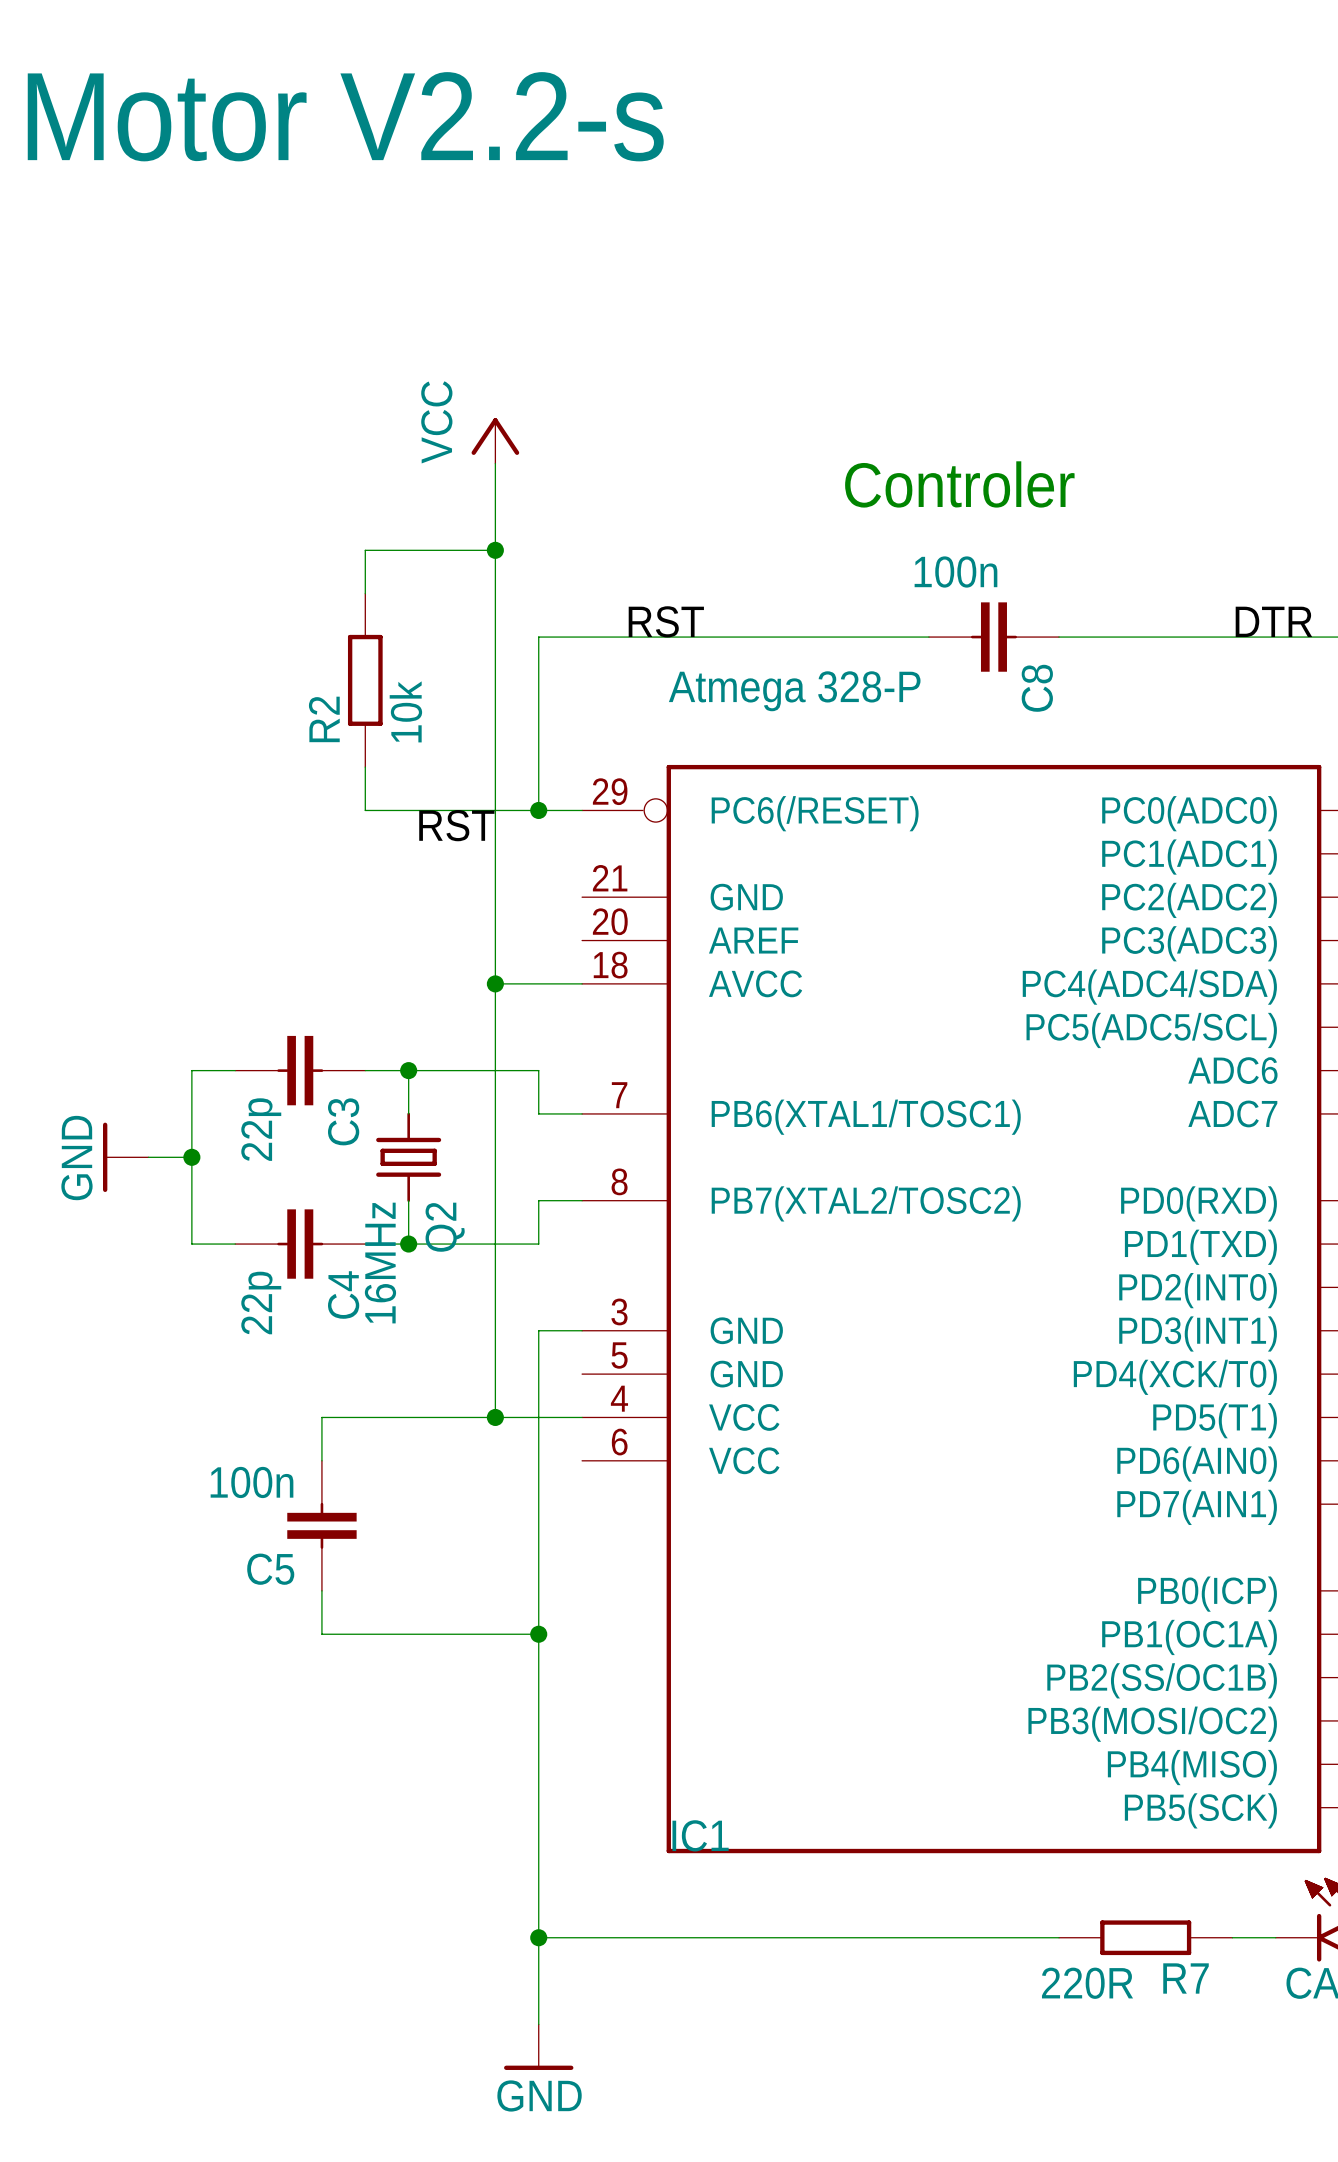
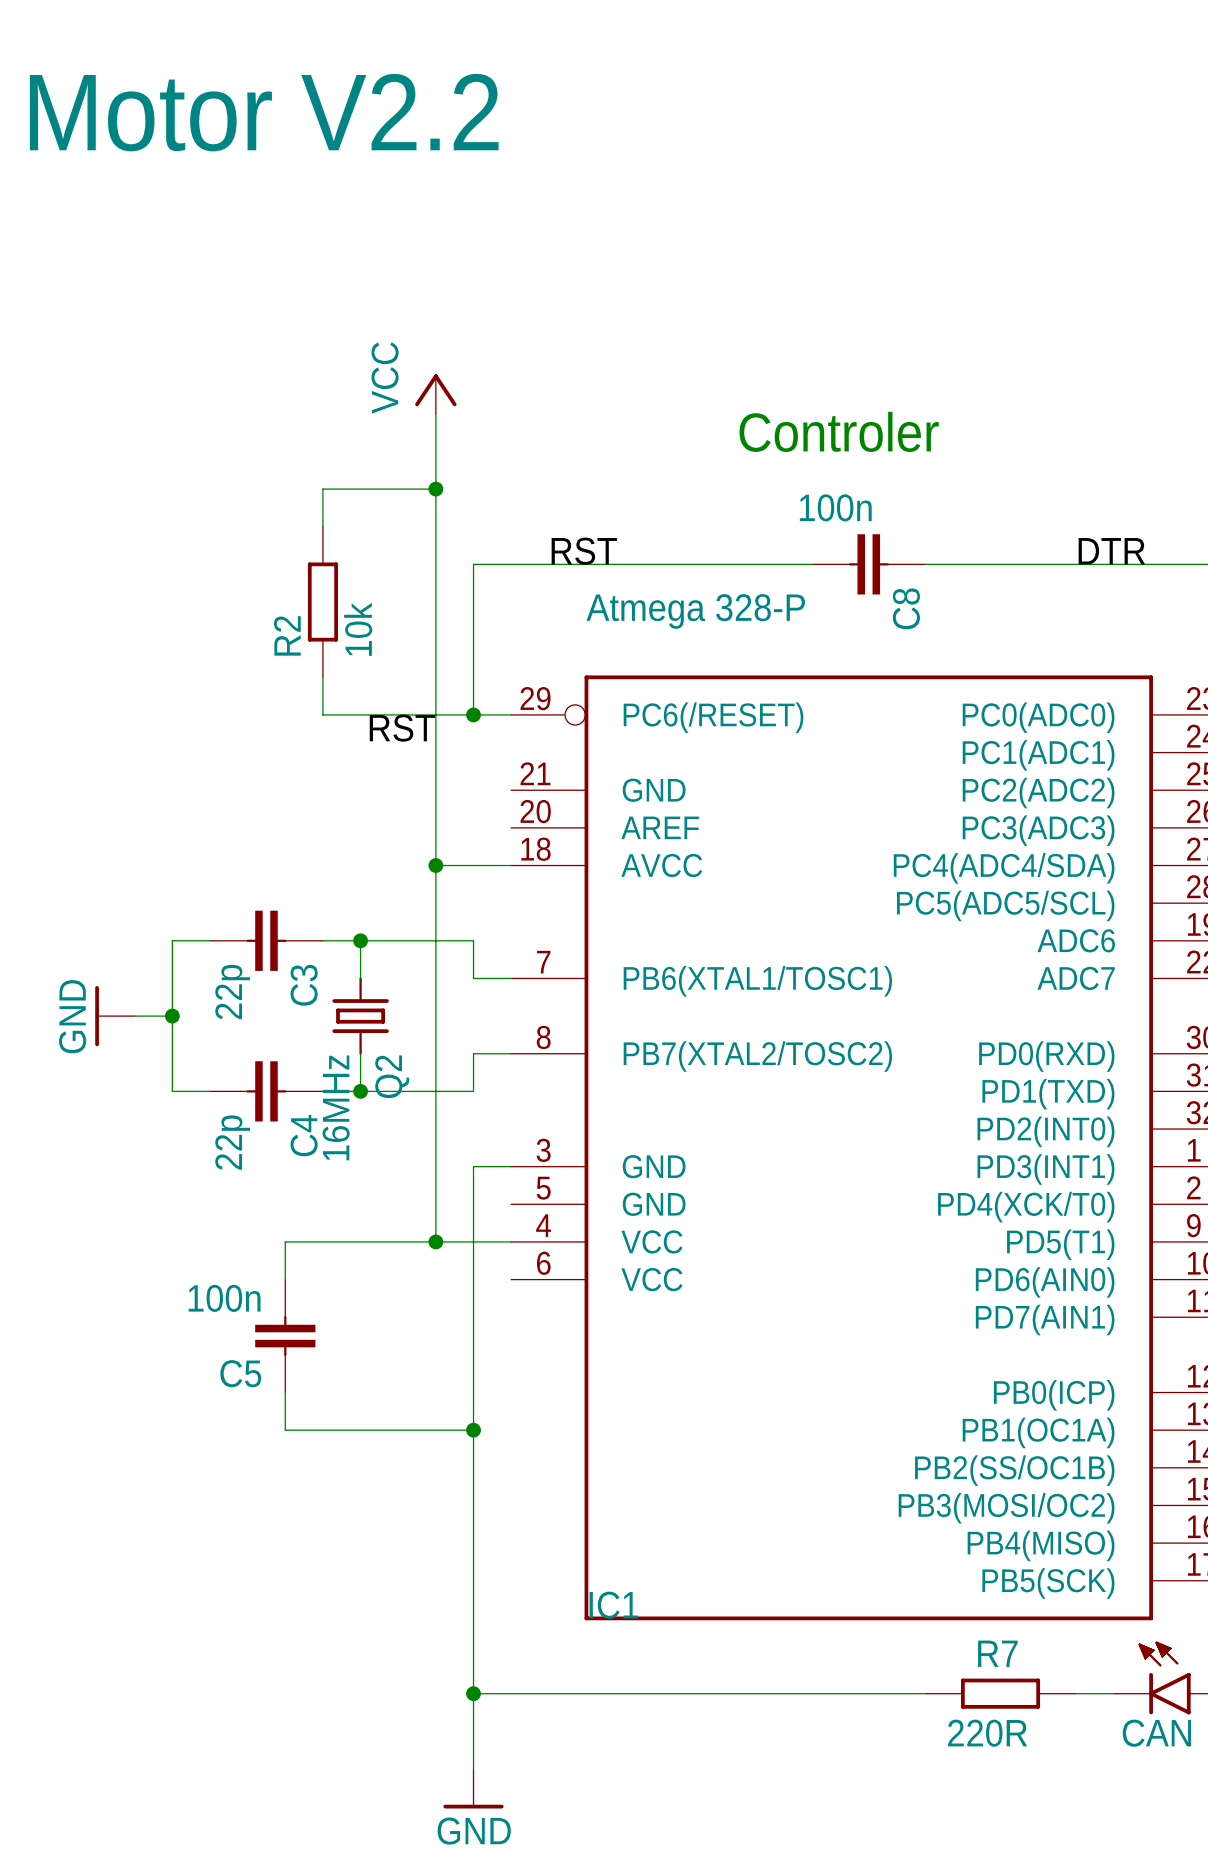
text: Motor V2.2-s (345, 116) -> Motor V2.2 (264, 112)
R7 name position: R7 (1186, 1978) -> R7 (997, 1653)
R7 value position: 220R (1087, 1983) -> 220R (987, 1733)

